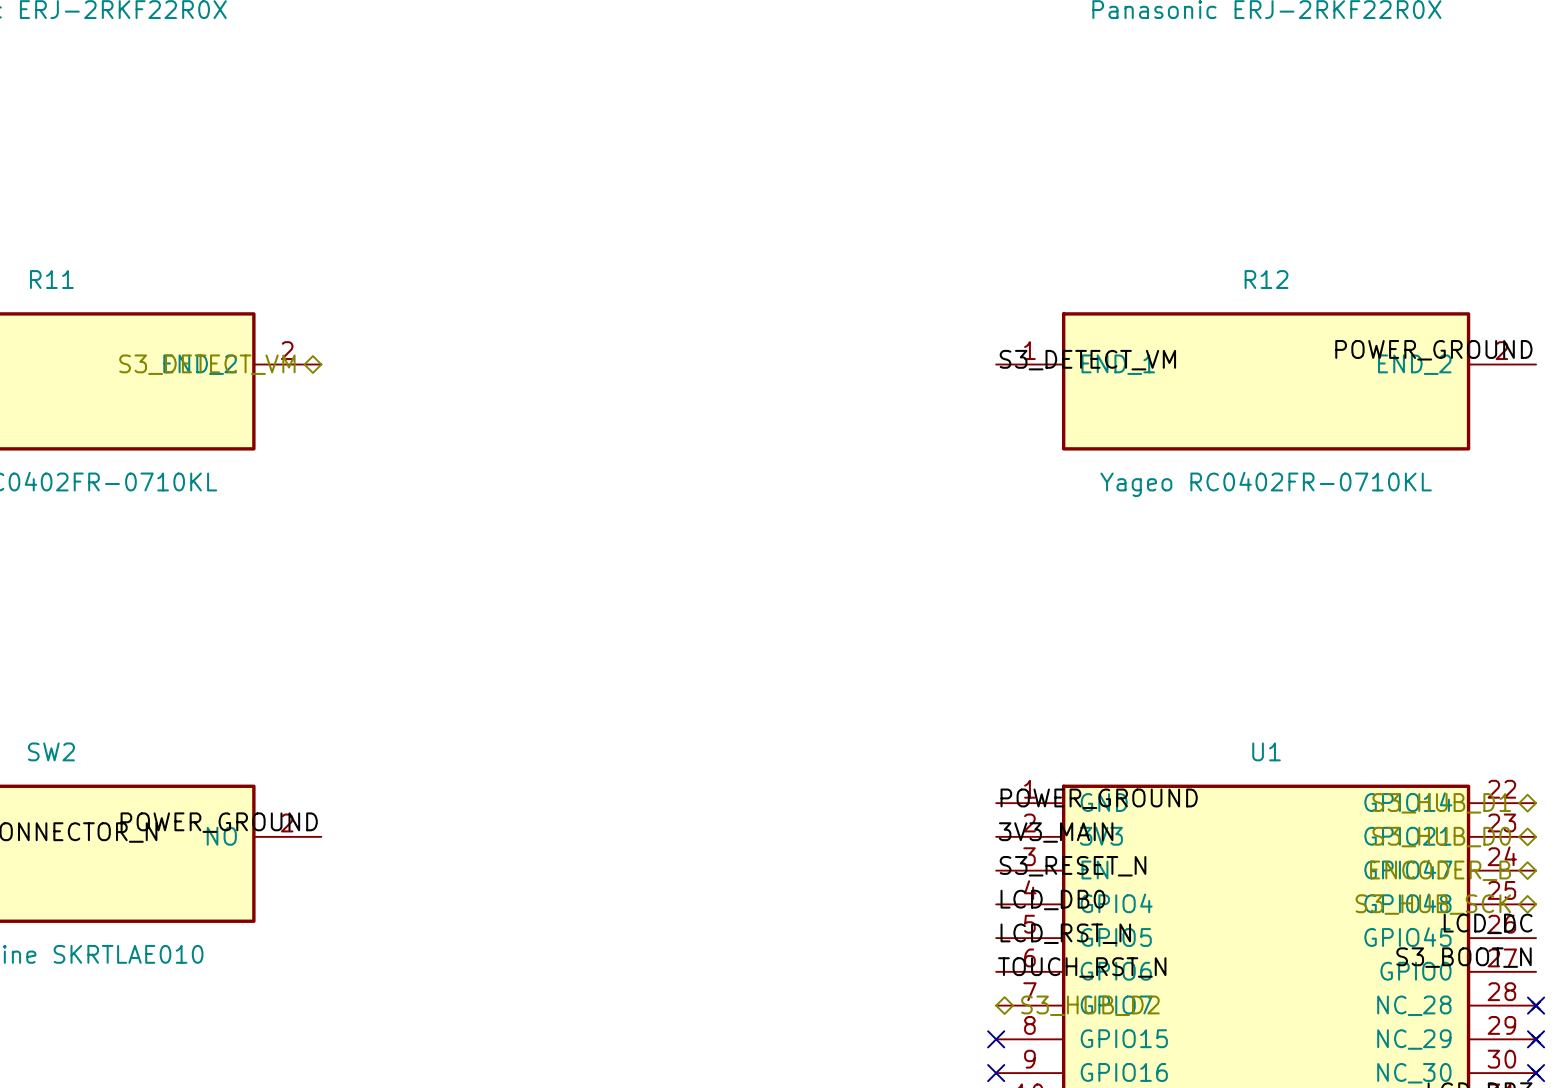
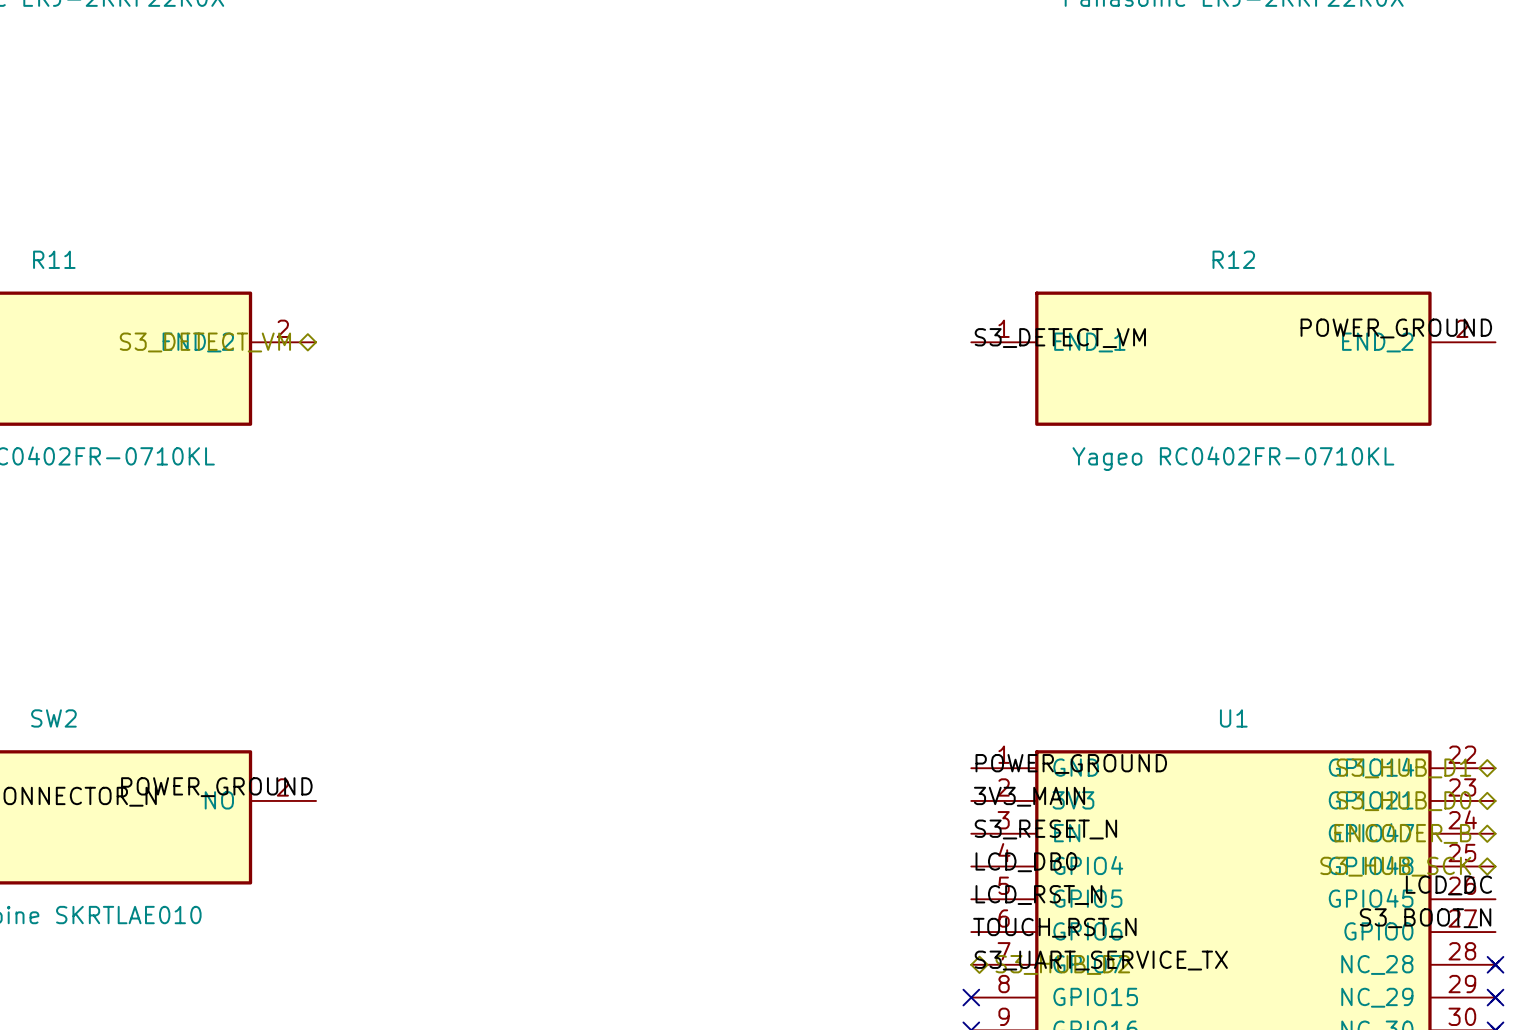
label: none -> S3_UART_SERVICE_TX (1101, 960)

